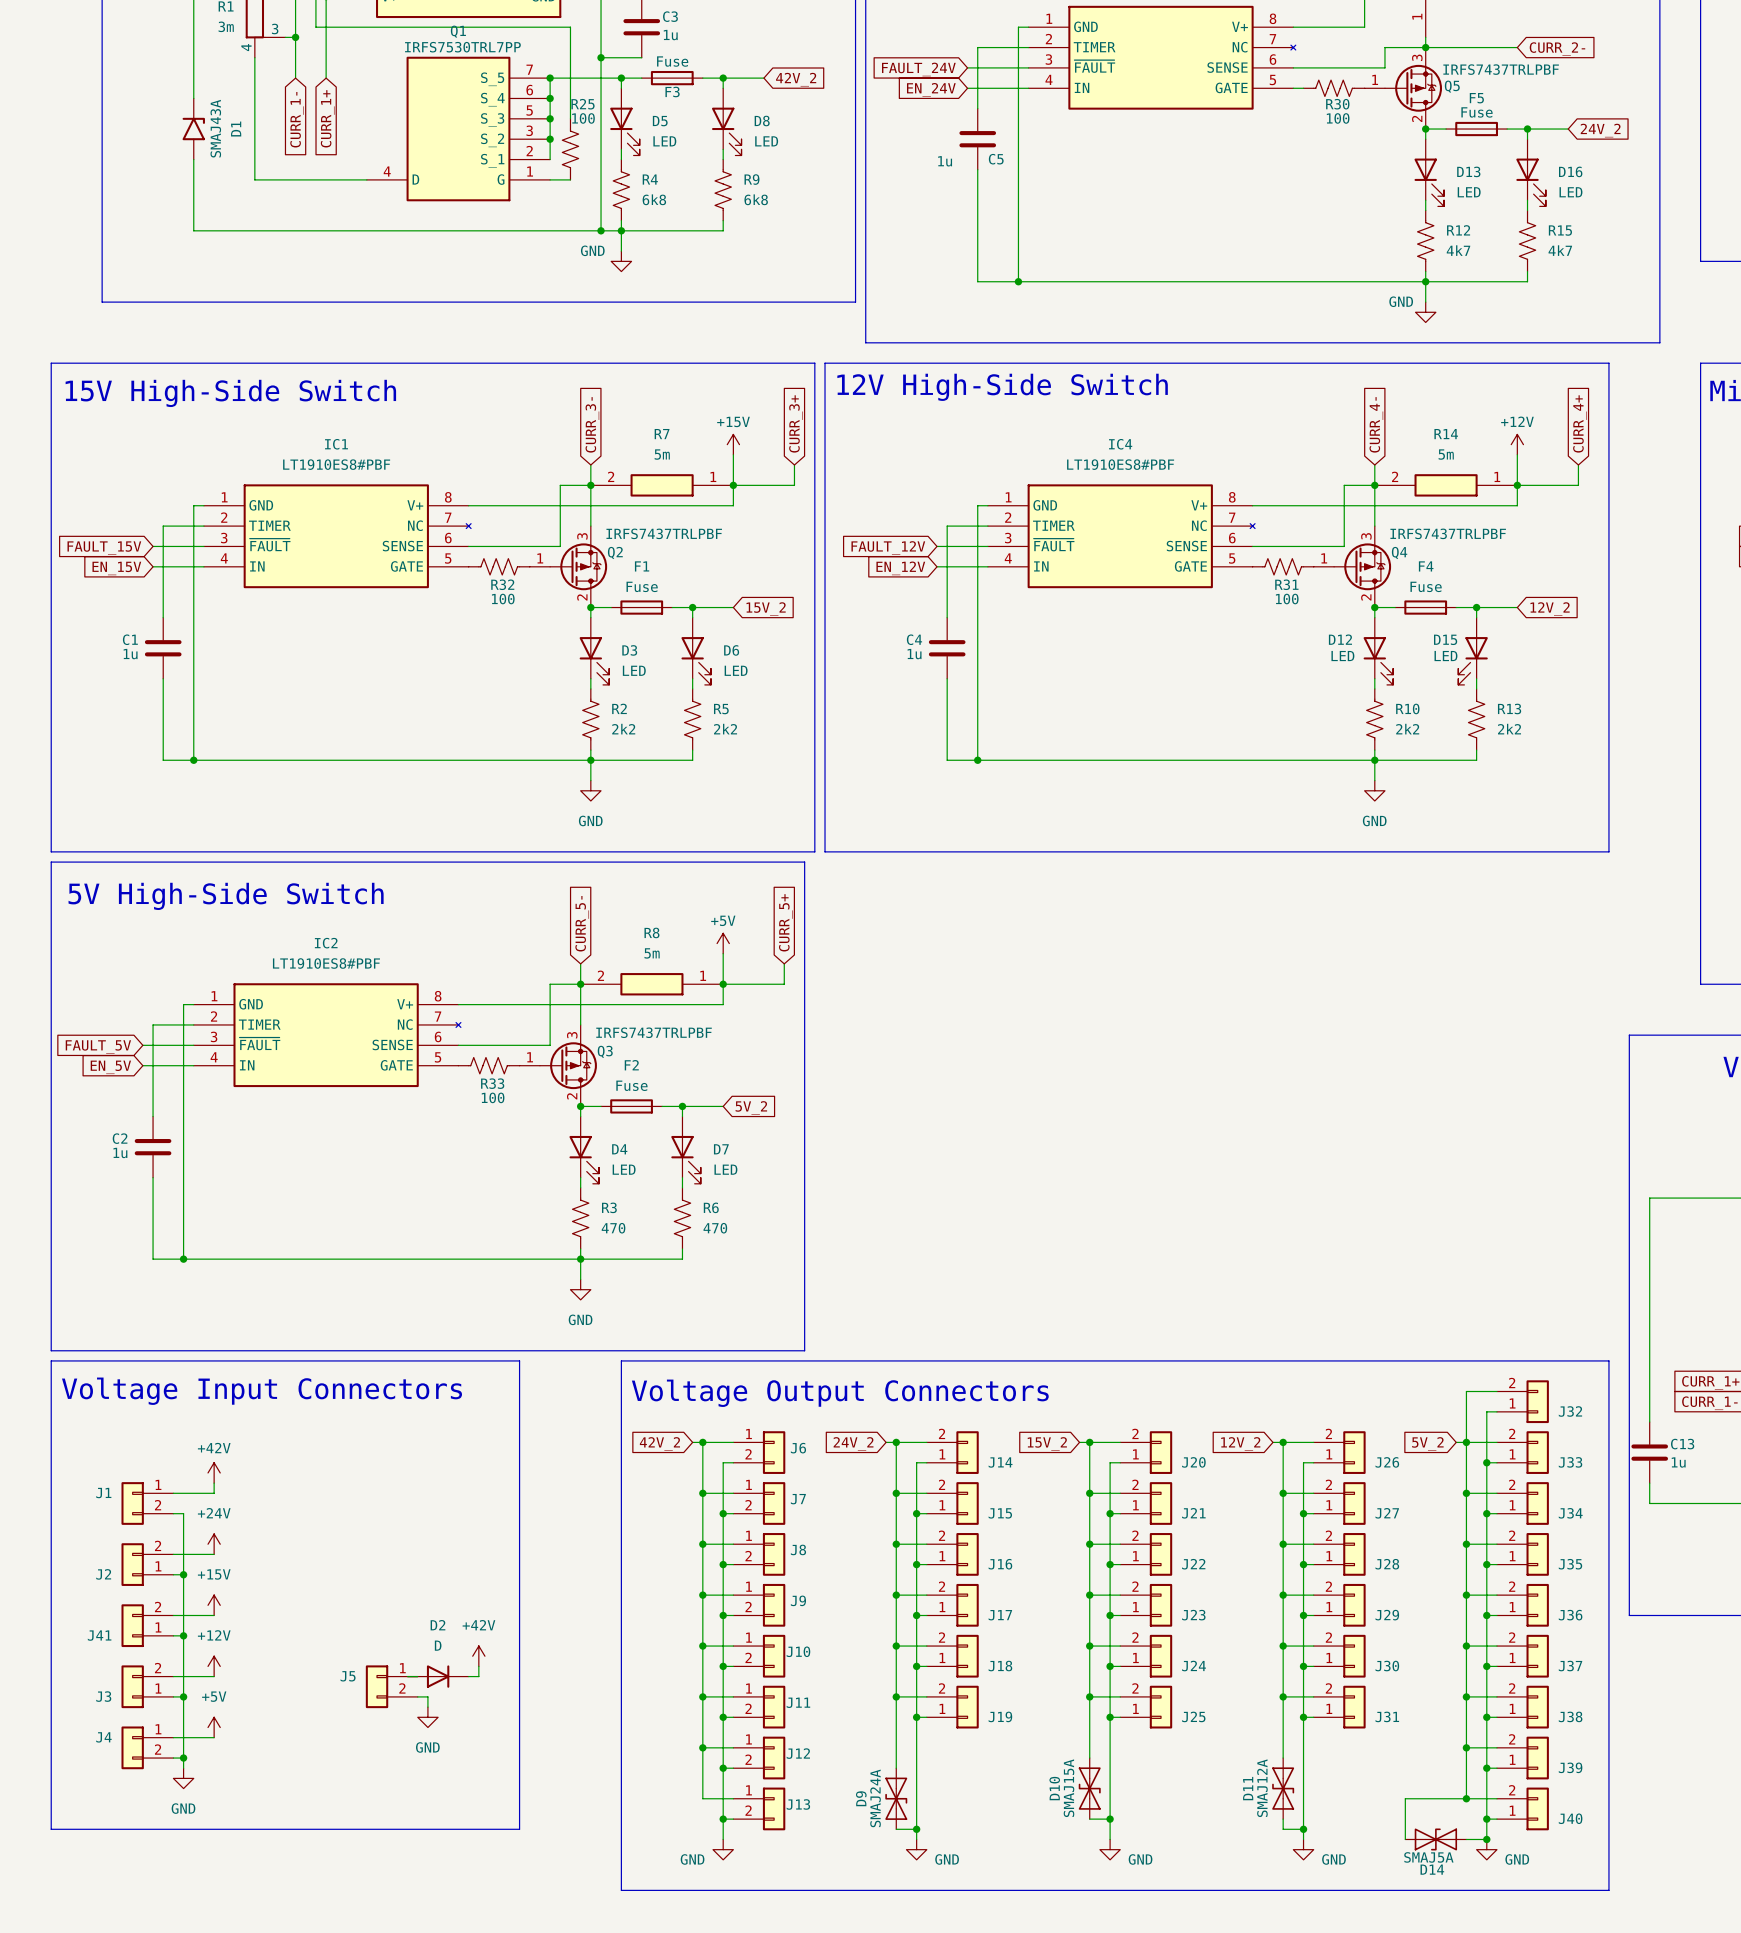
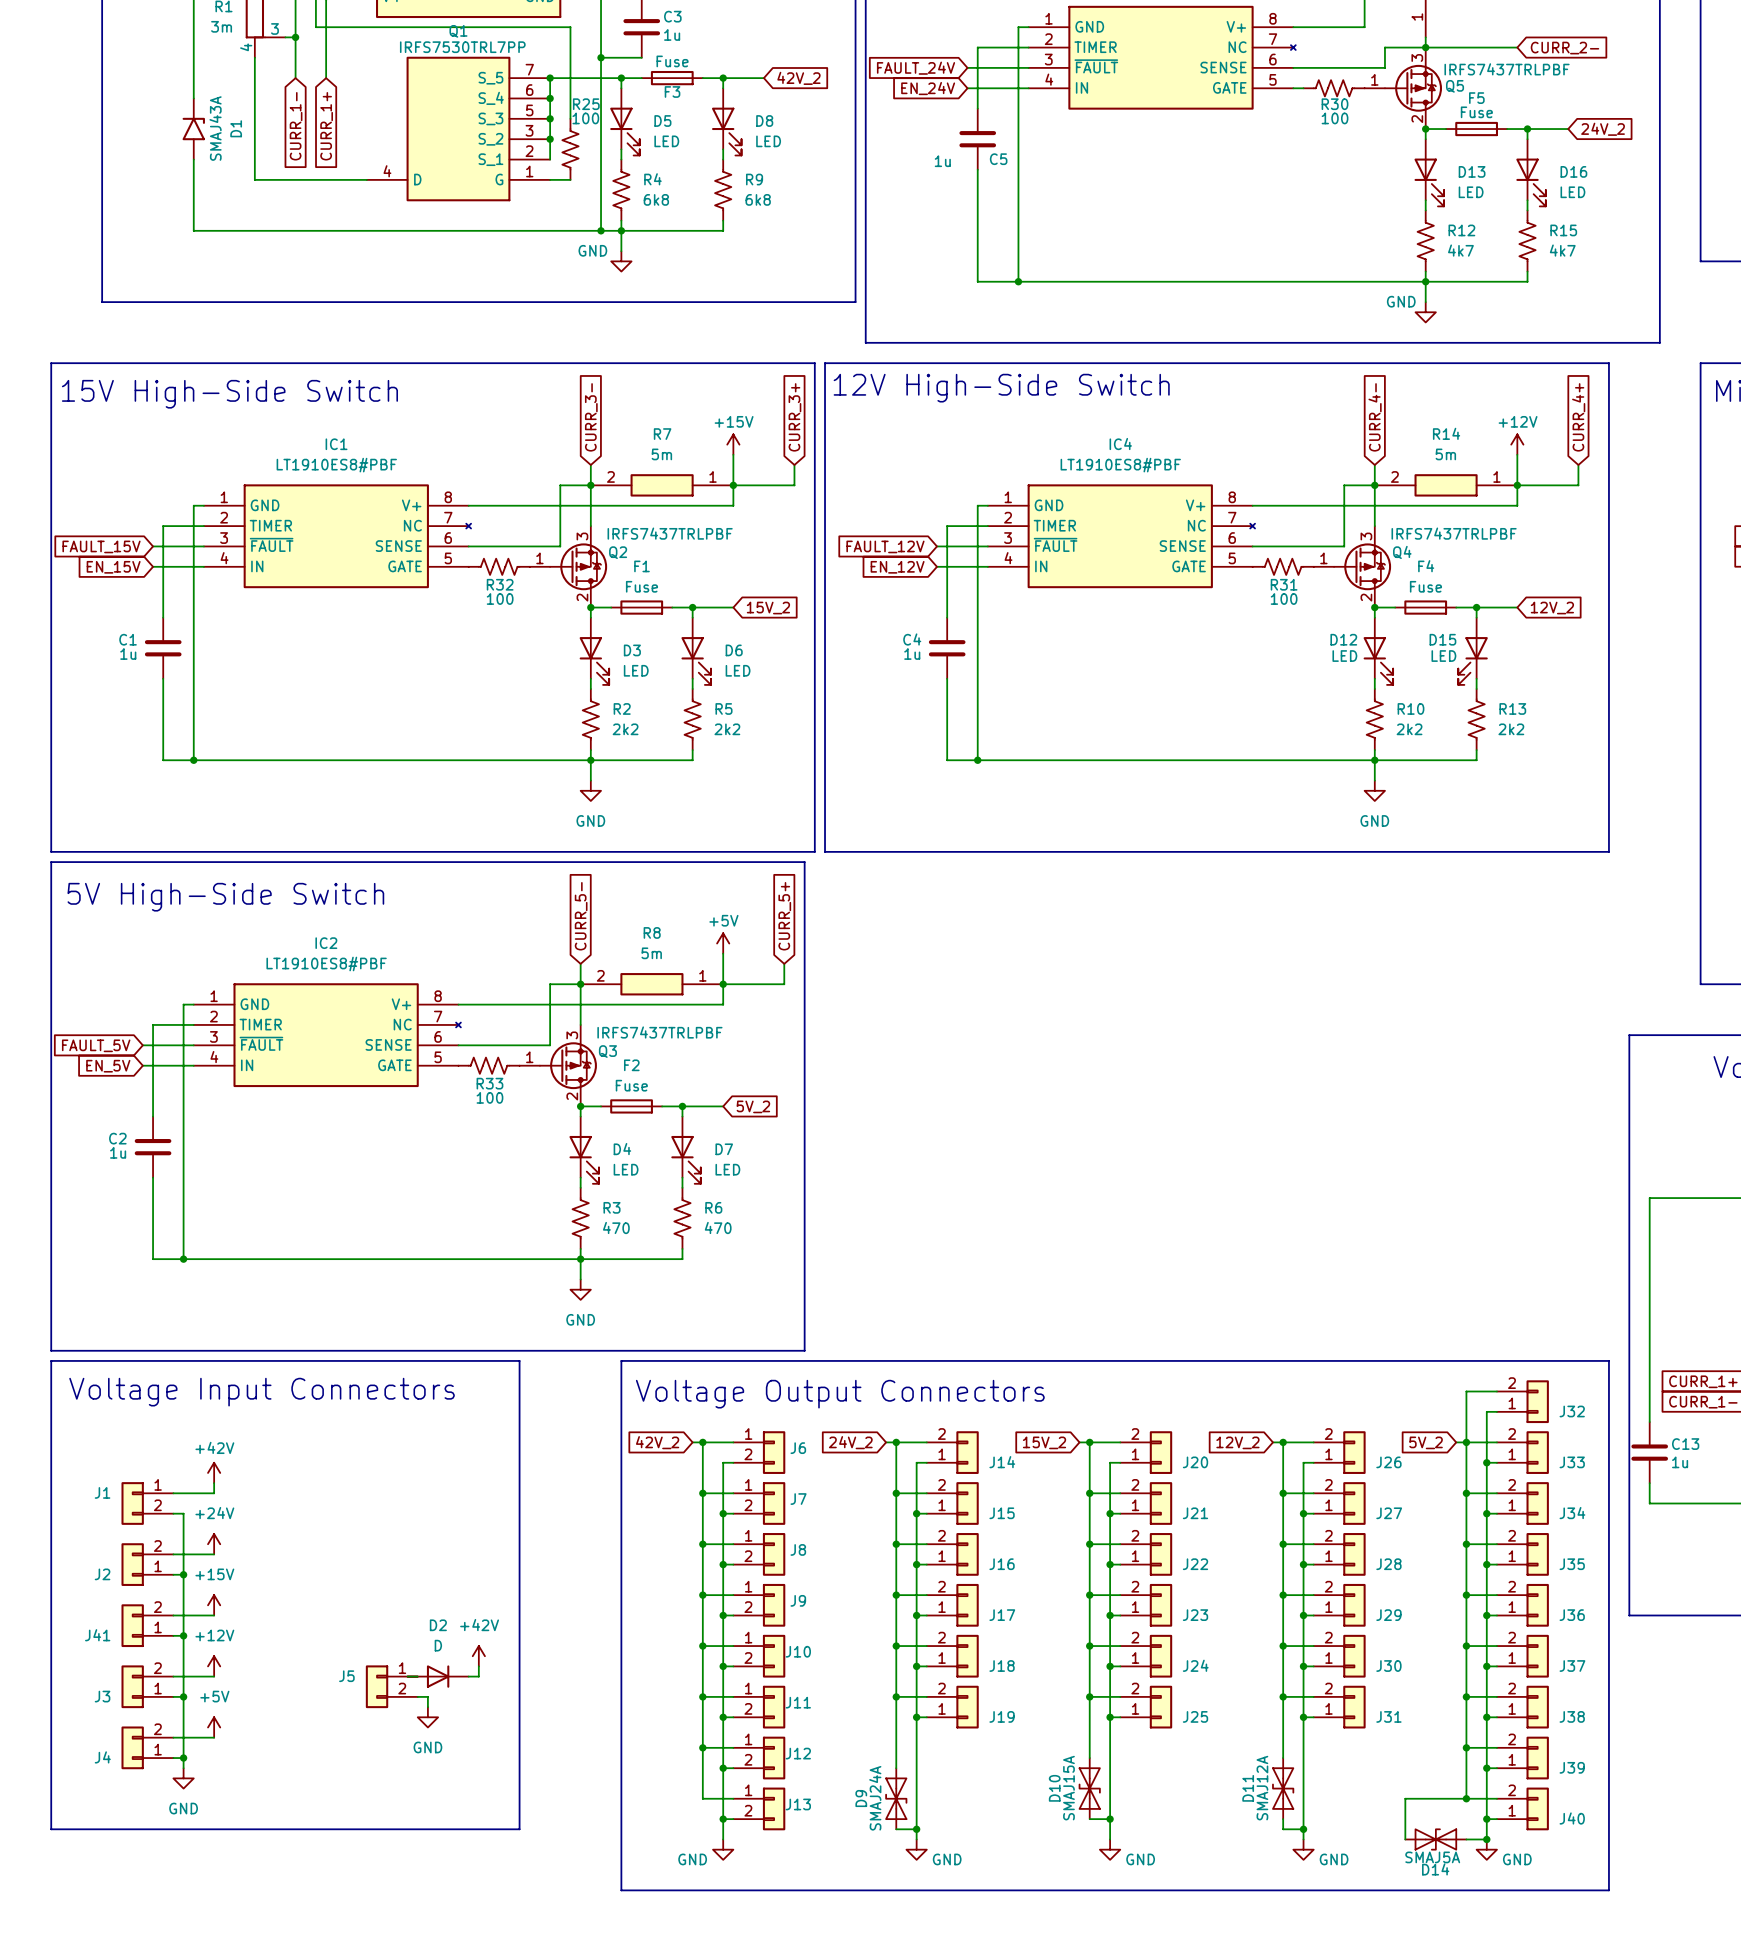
J4 flip: as is (132, 1747) -> up-down (132, 1747)

